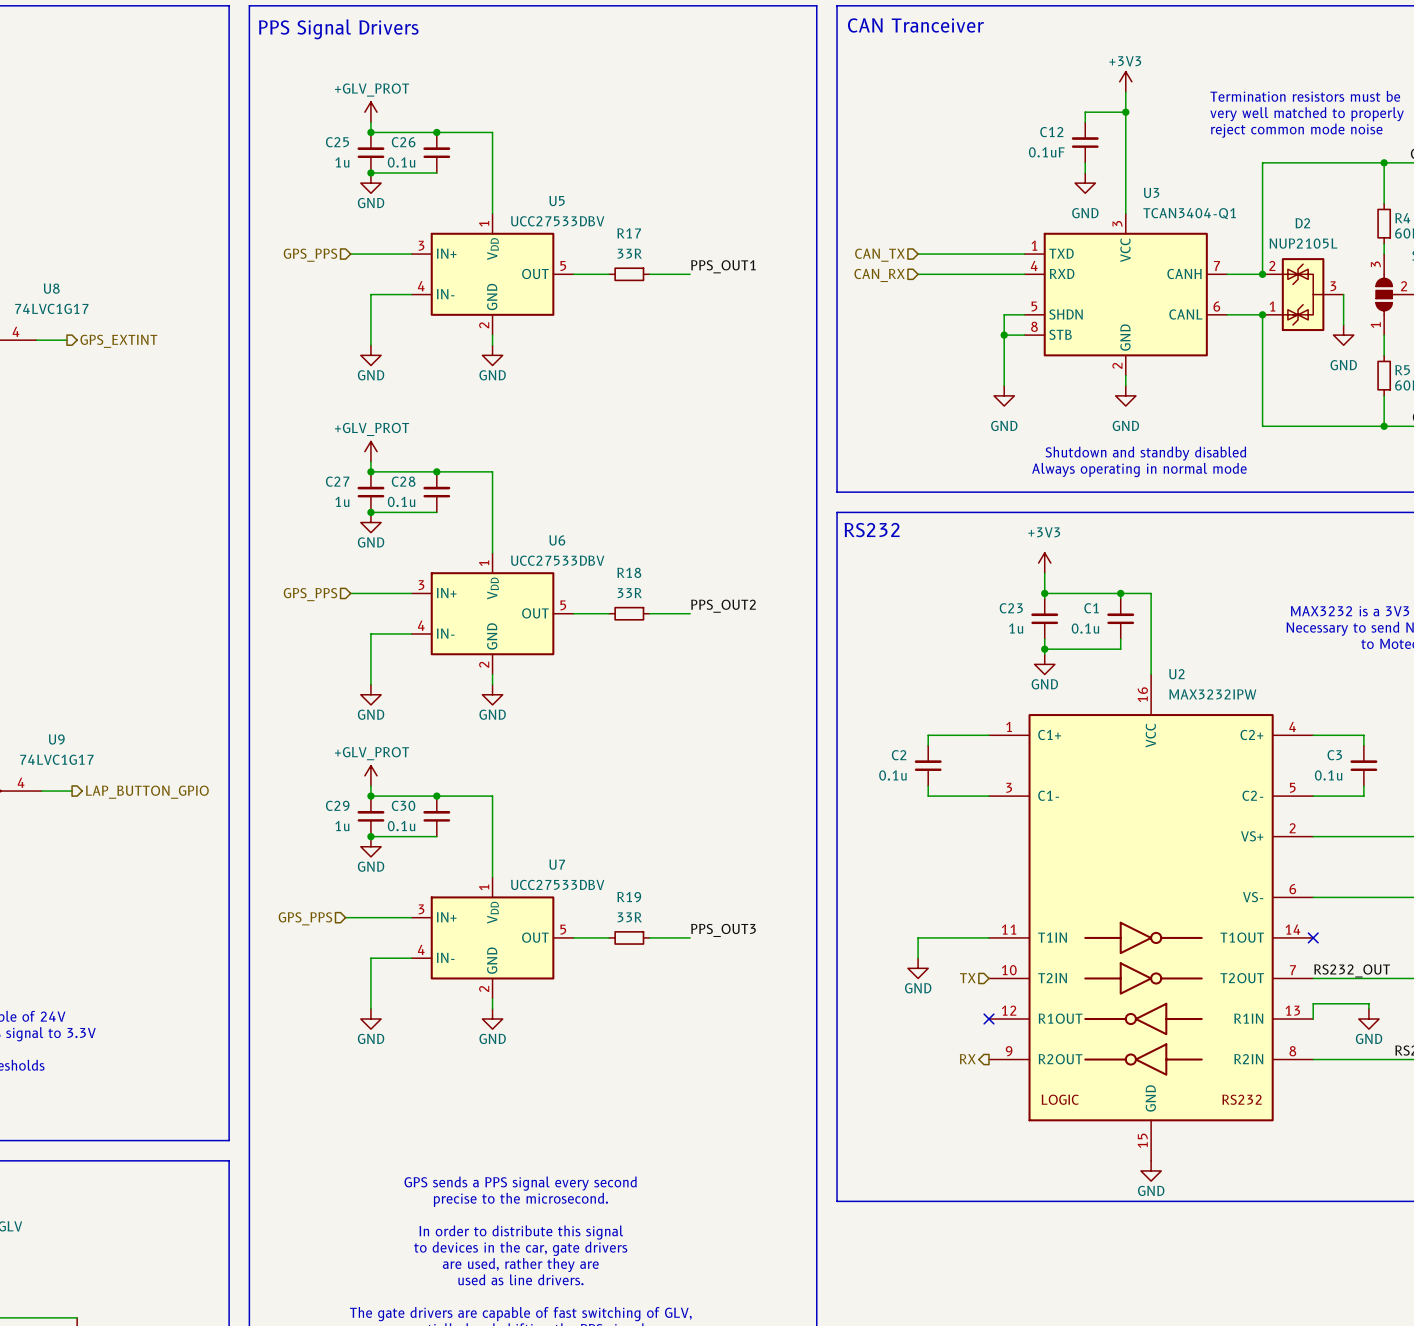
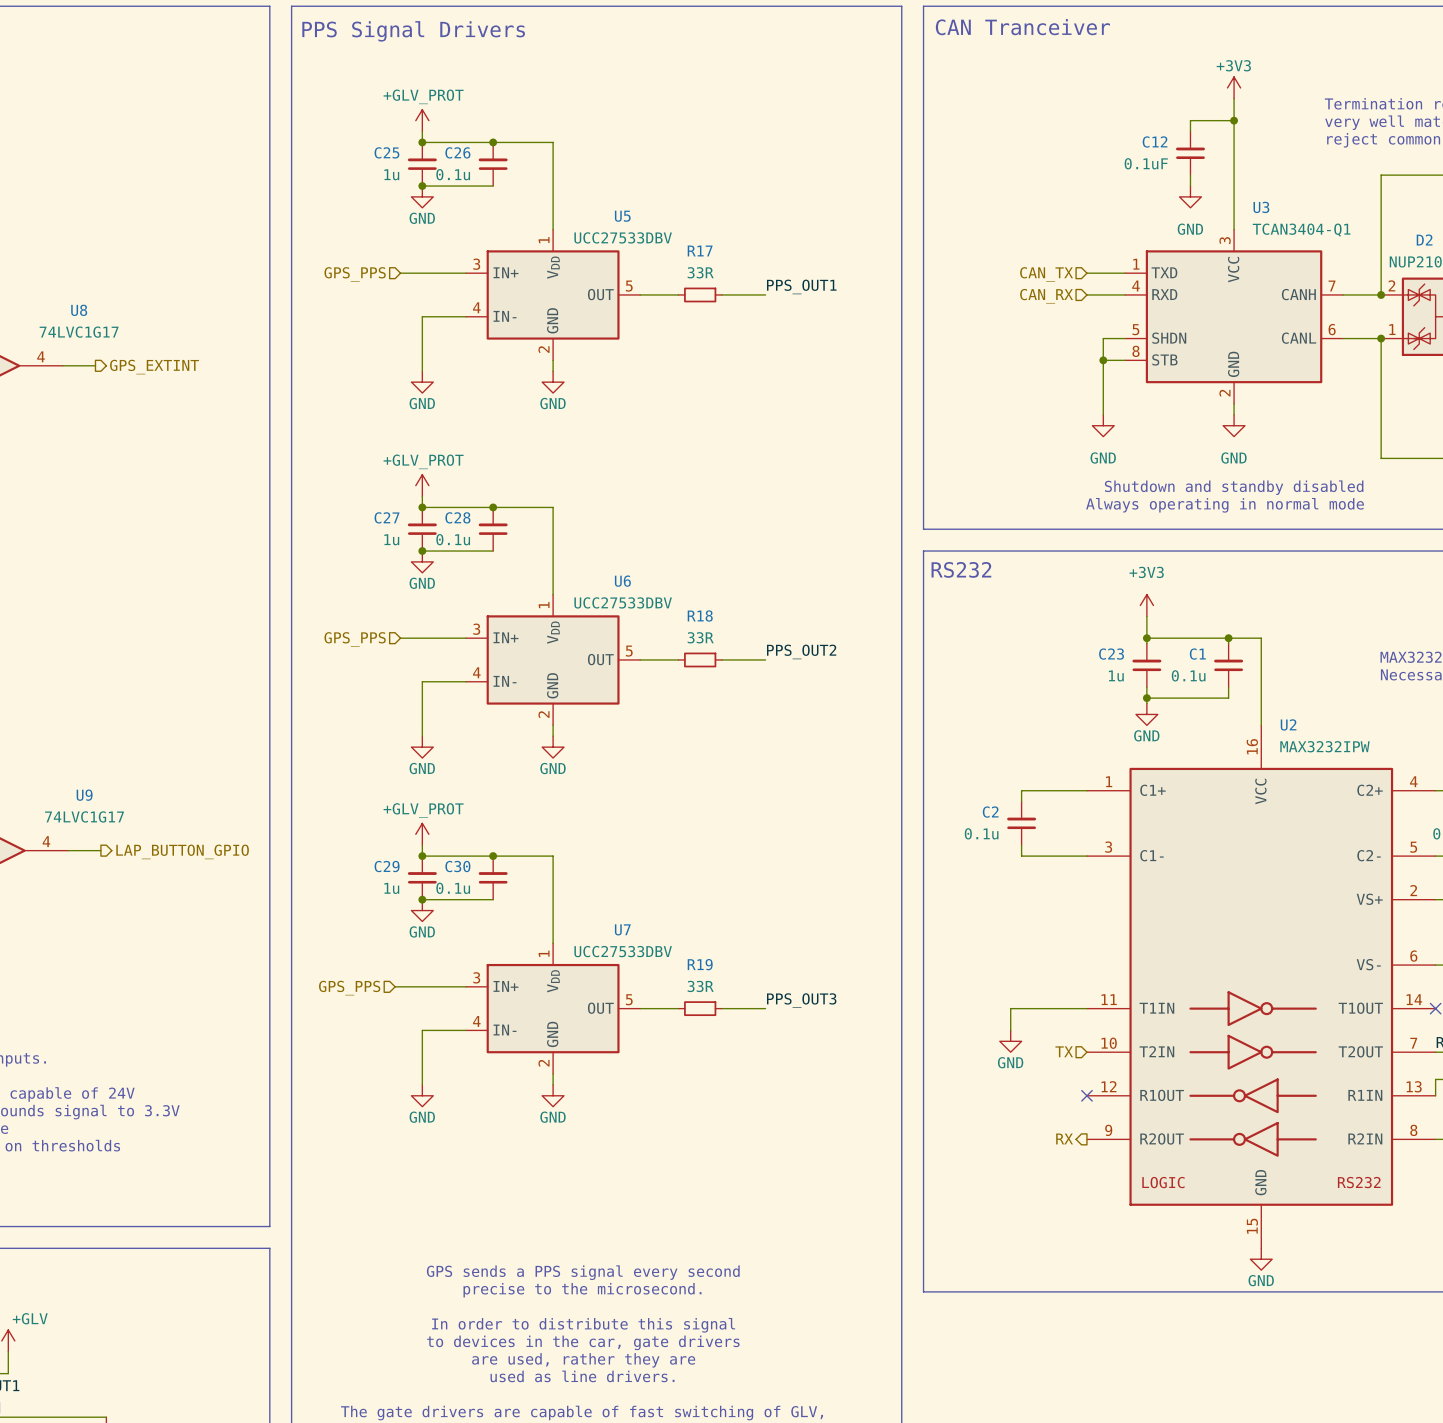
wire: (918, 254) (989, 254) -> none
hierarchical label position: CAN_TX (879, 255) -> CAN_TX (1046, 274)
wire: (918, 274) (989, 274) -> none
hierarchical label position: CAN_RX (879, 275) -> CAN_RX (1046, 296)

